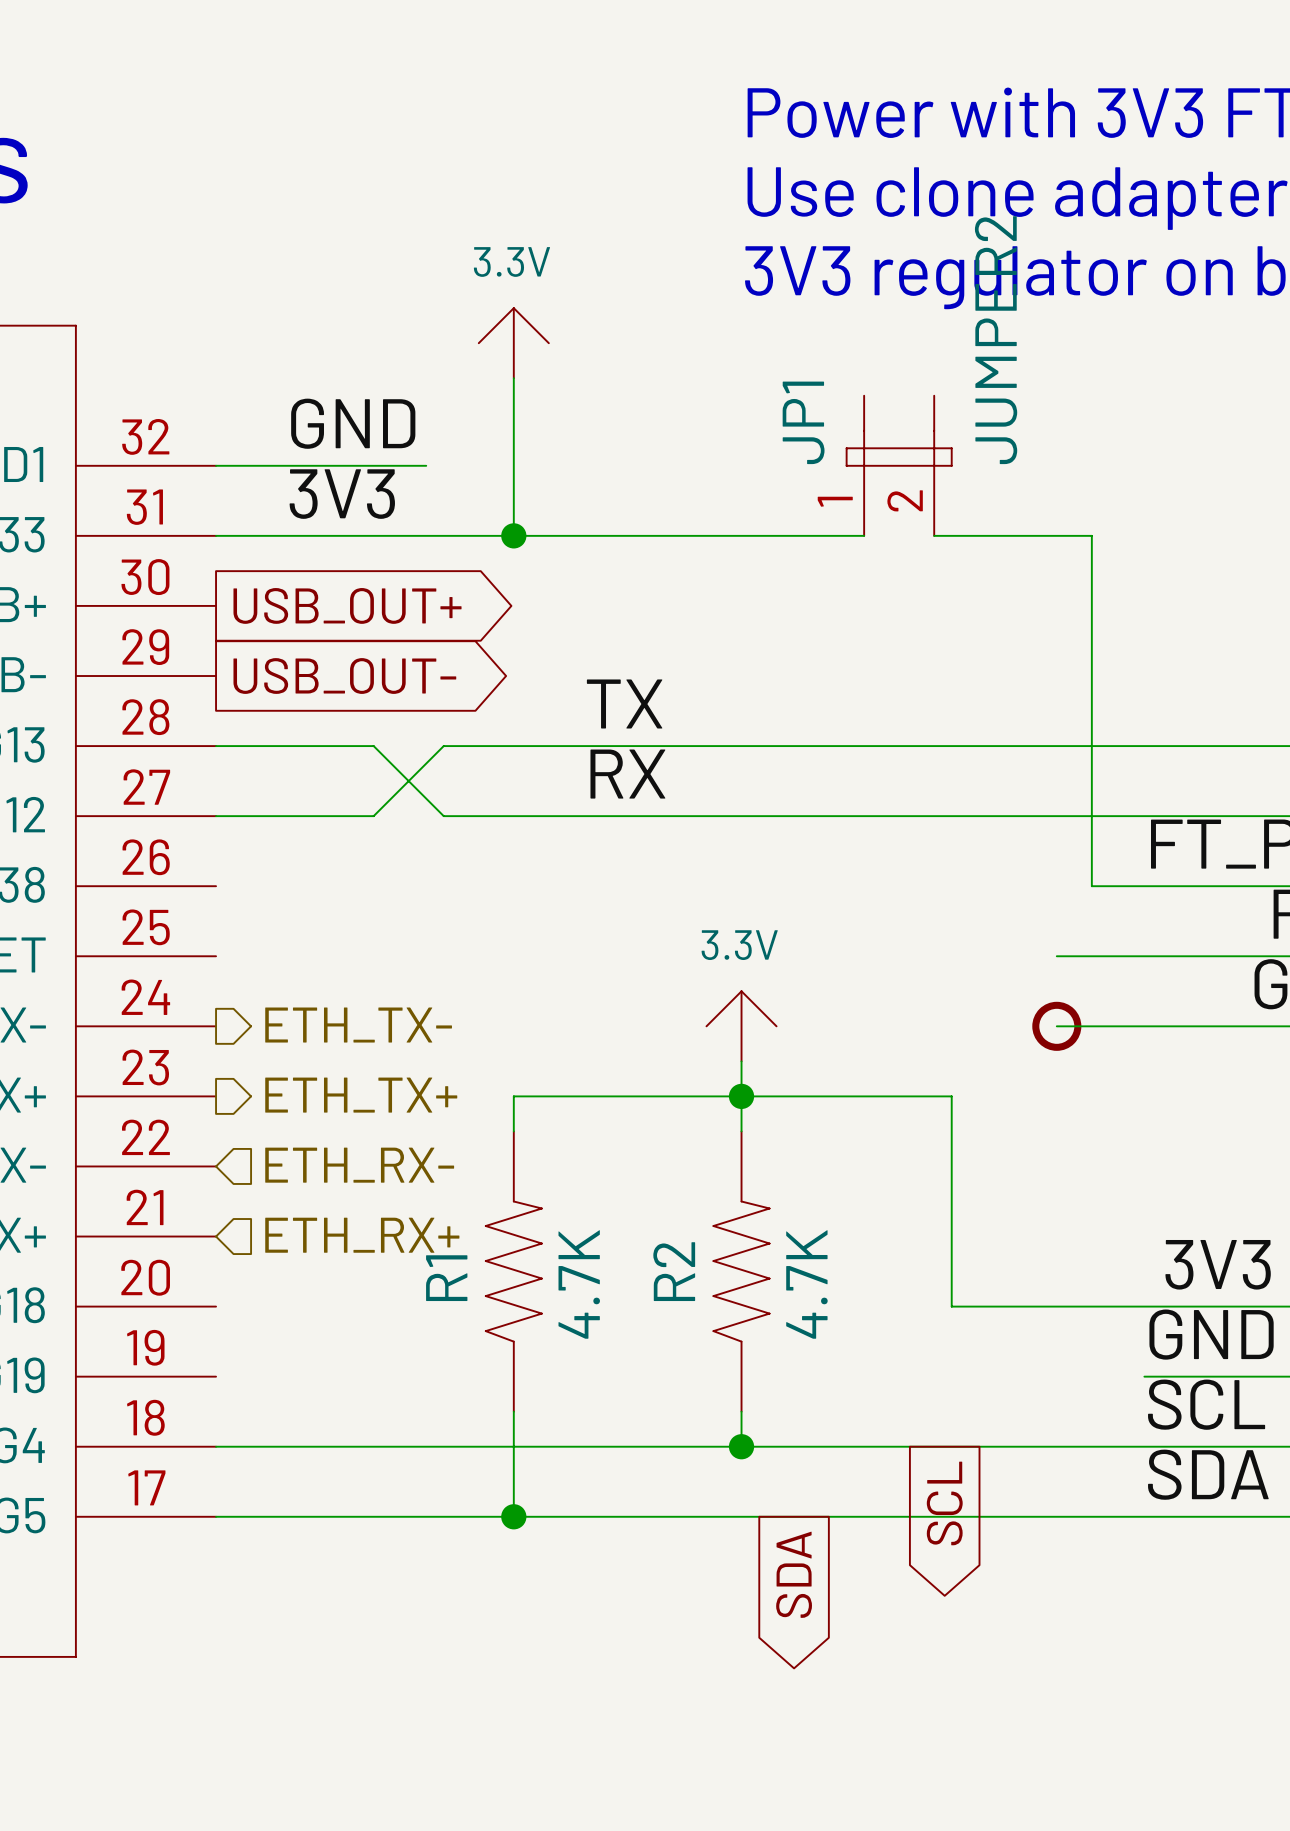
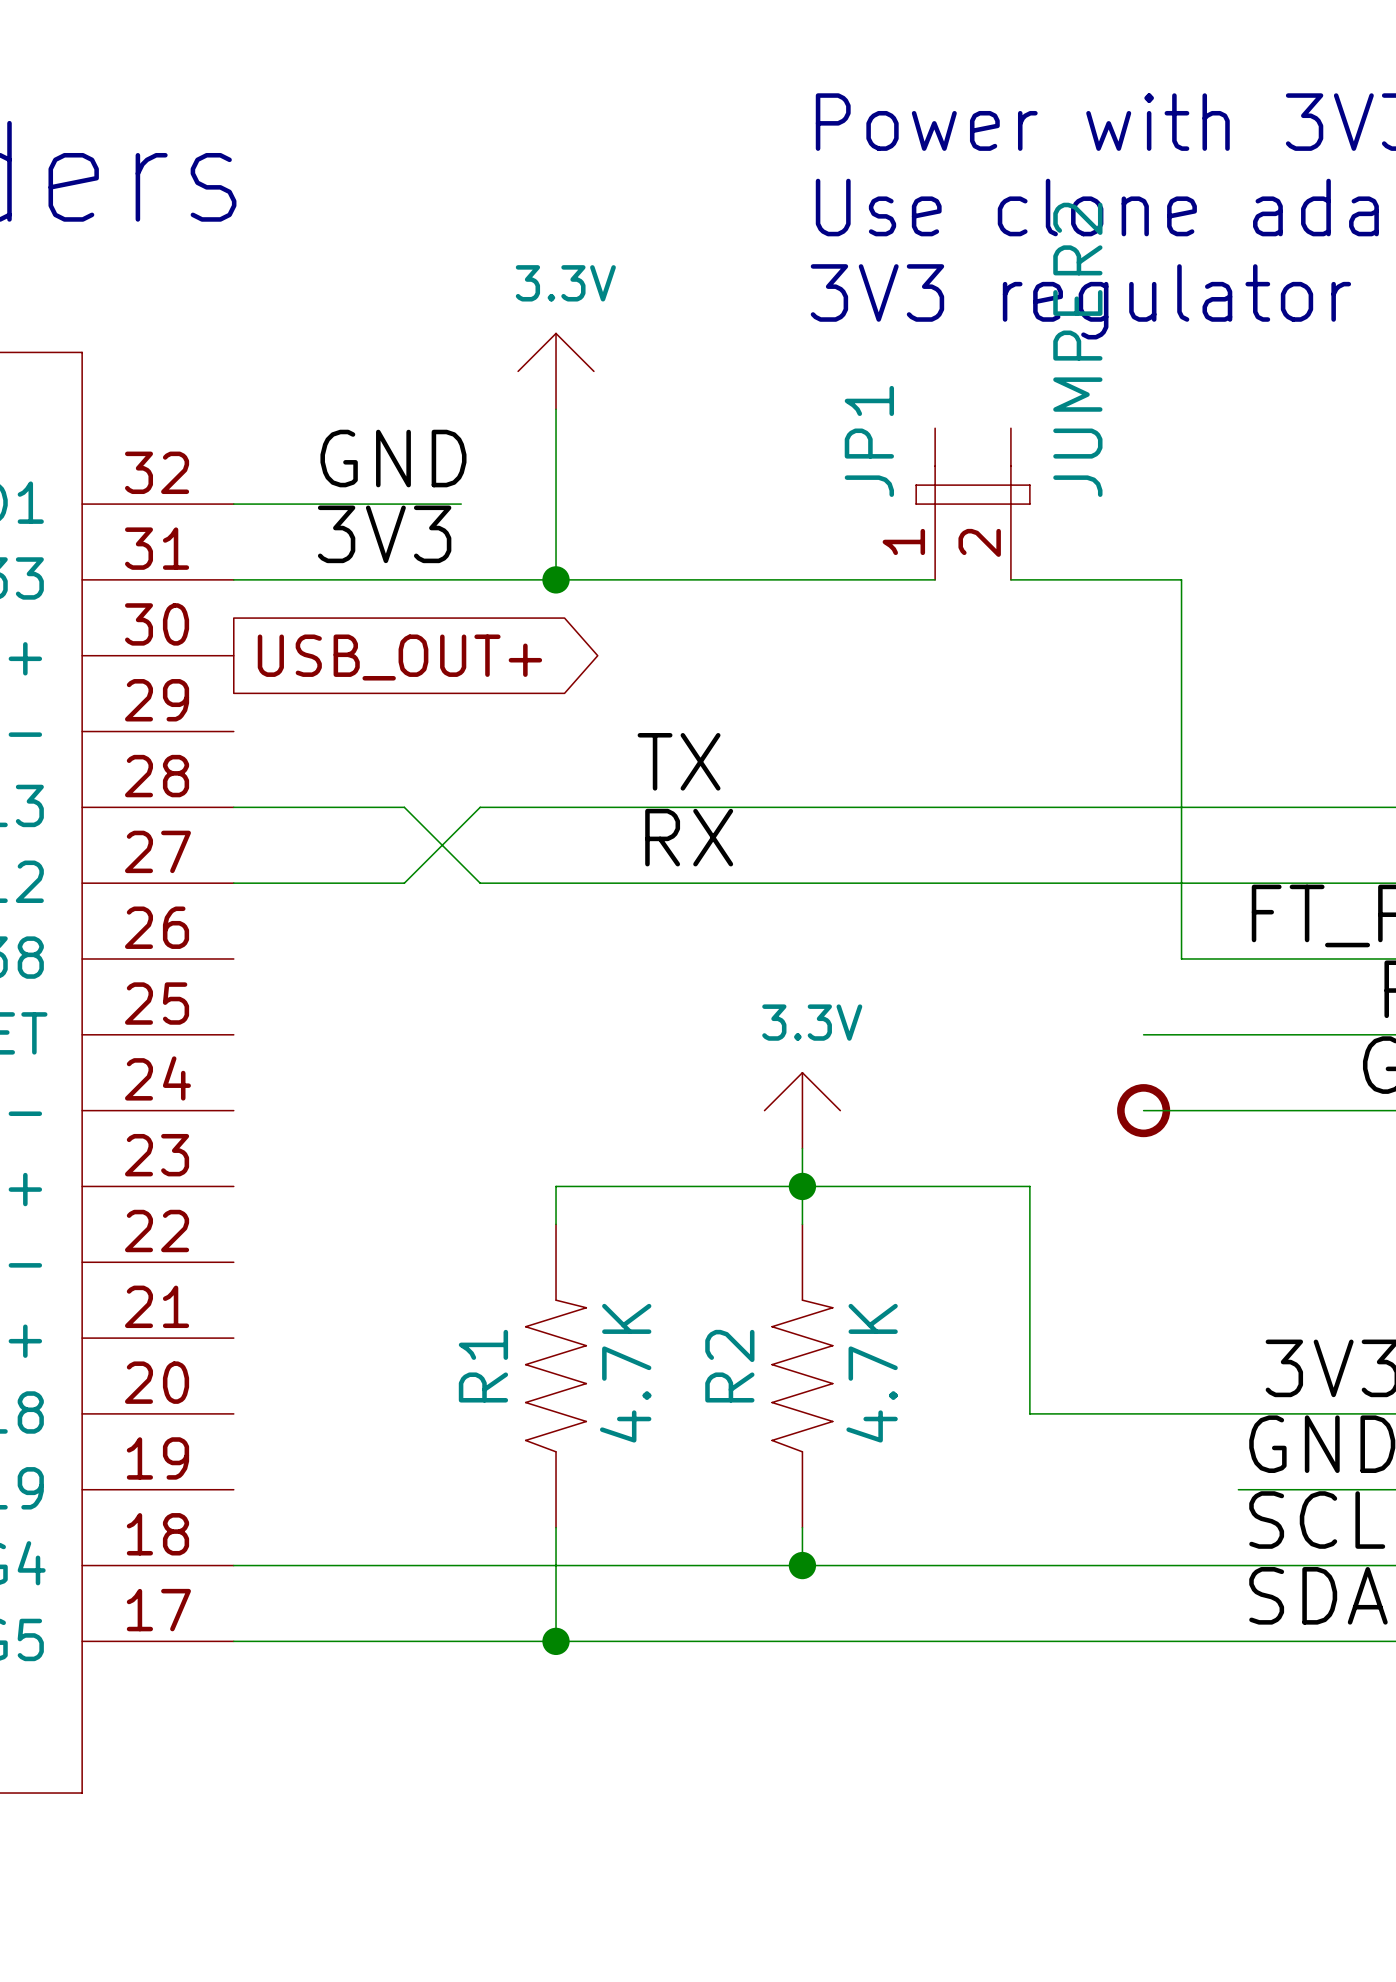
global label: USB_OUT- (344, 676) -> none
hierarchical label: ETH_TX- (358, 1025) -> none
hierarchical label: ETH_TX+ (361, 1095) -> none
hierarchical label: ETH_RX- (359, 1165) -> none
hierarchical label: ETH_RX+ (362, 1235) -> none
global label: SCL (944, 1503) -> none
global label: SDA (794, 1574) -> none

